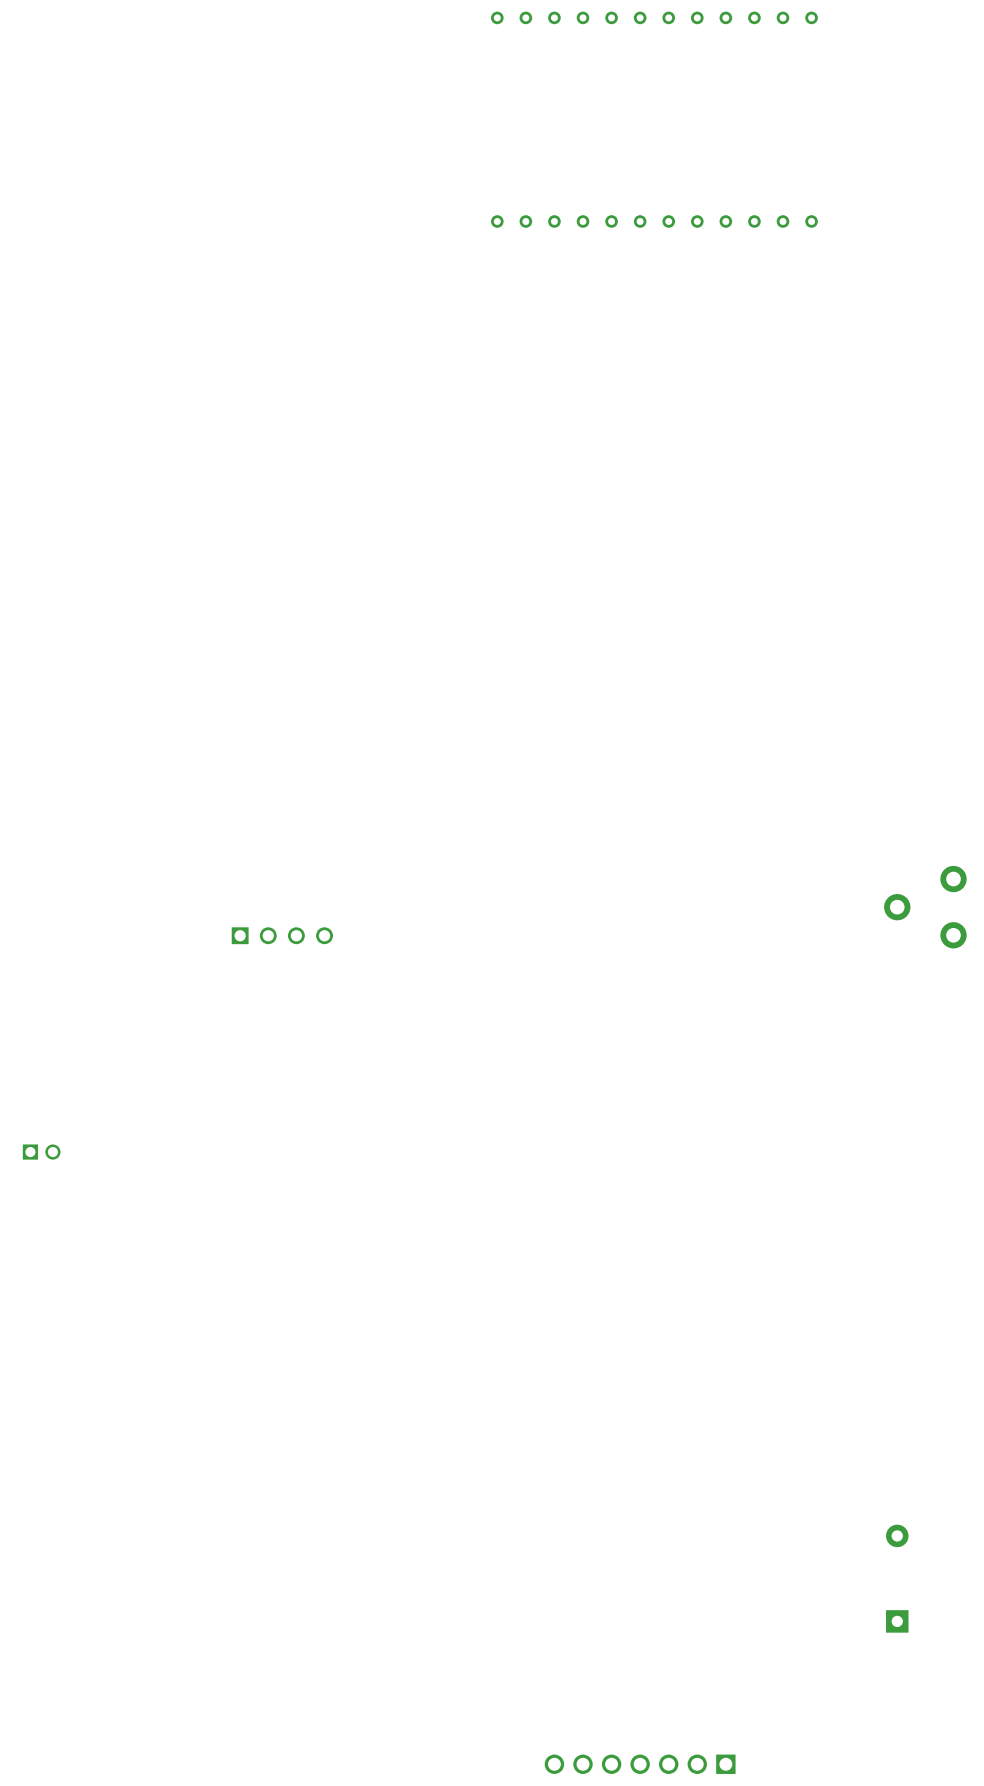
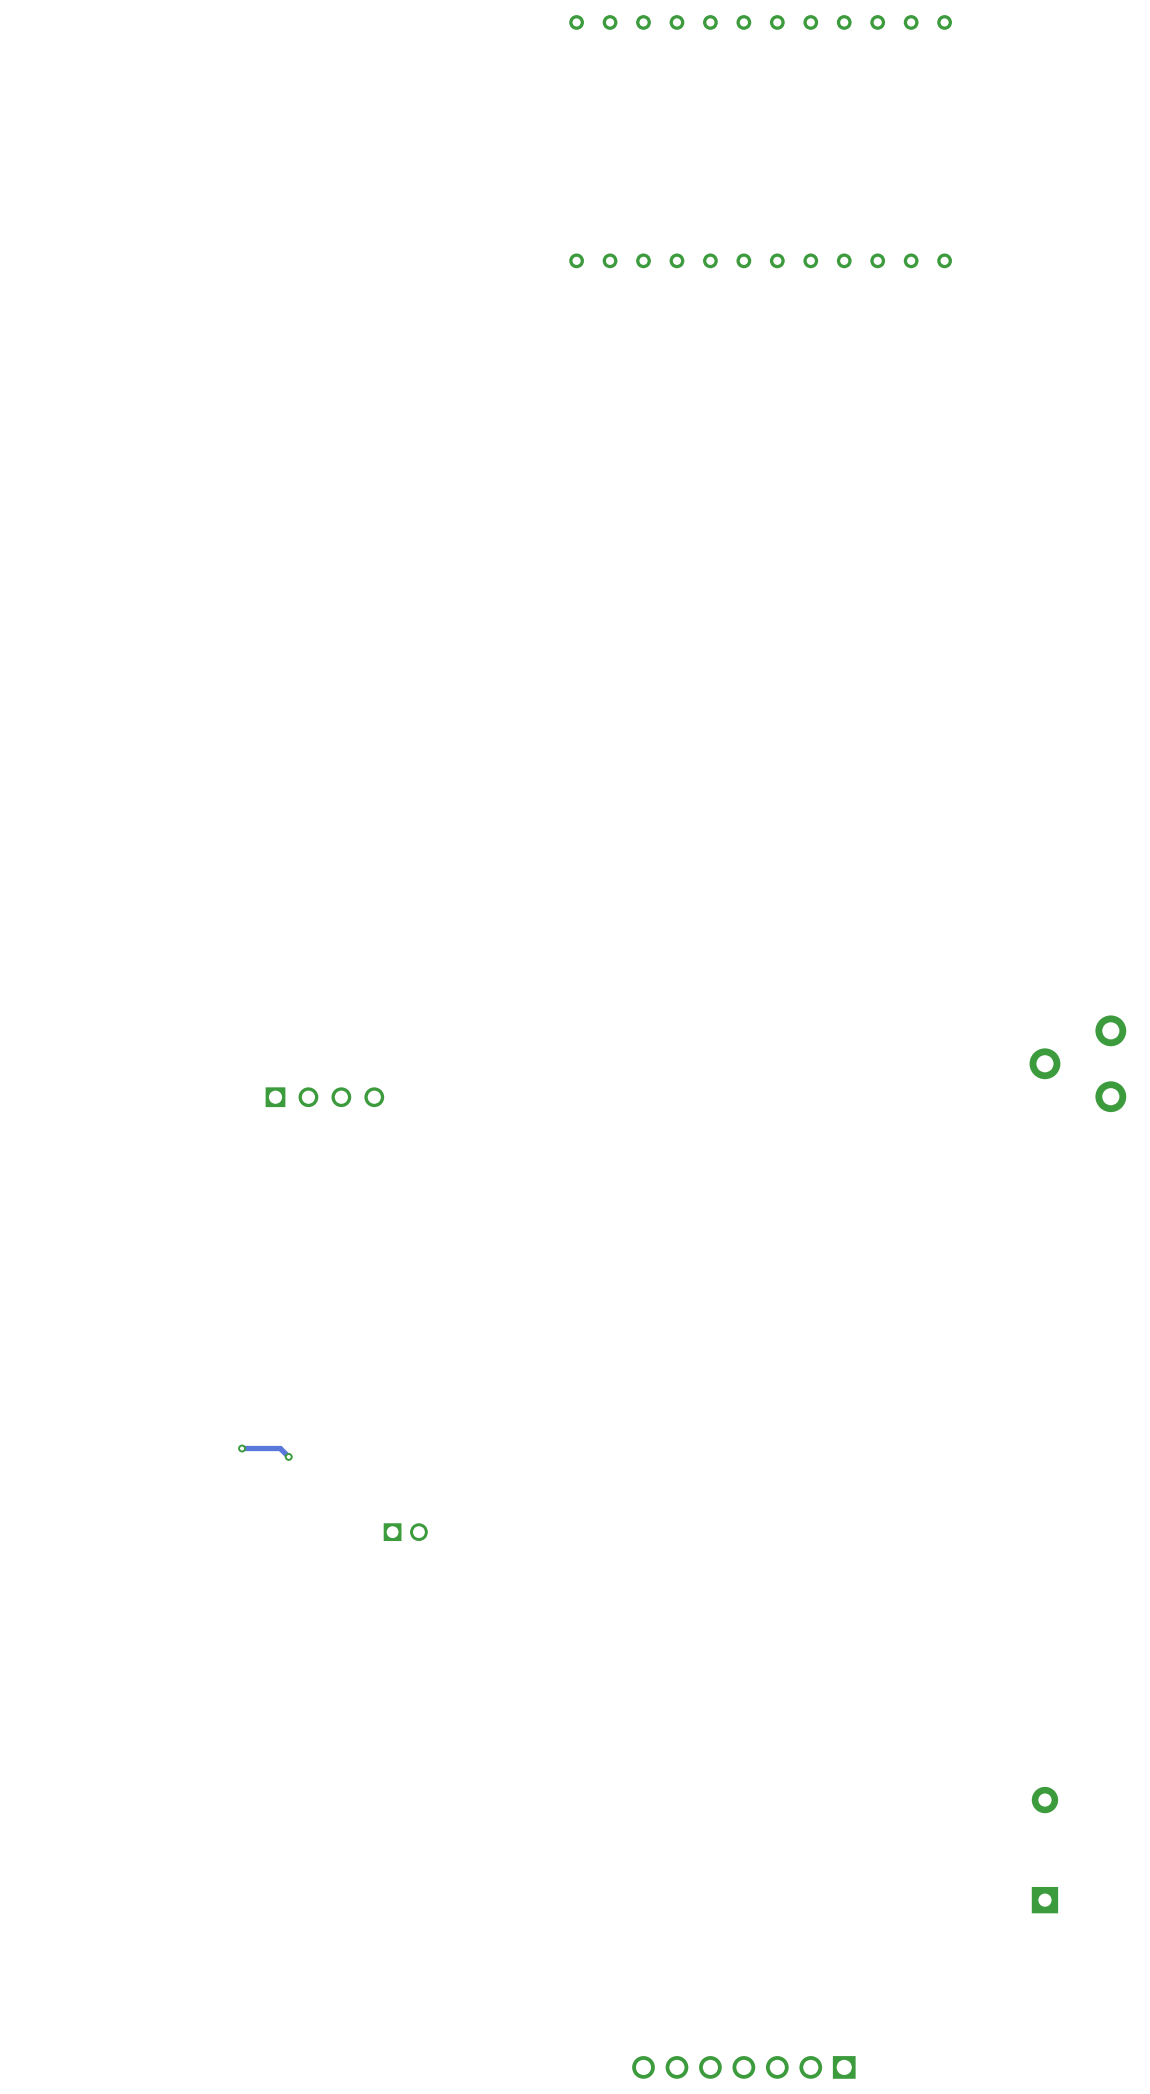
part: (41, 1152) -> none
track: none -> (242, 1448) (280, 1448) (288, 1456)
via: none -> (242, 1448)
via: none -> (288, 1456)
part: none -> (405, 1532)

